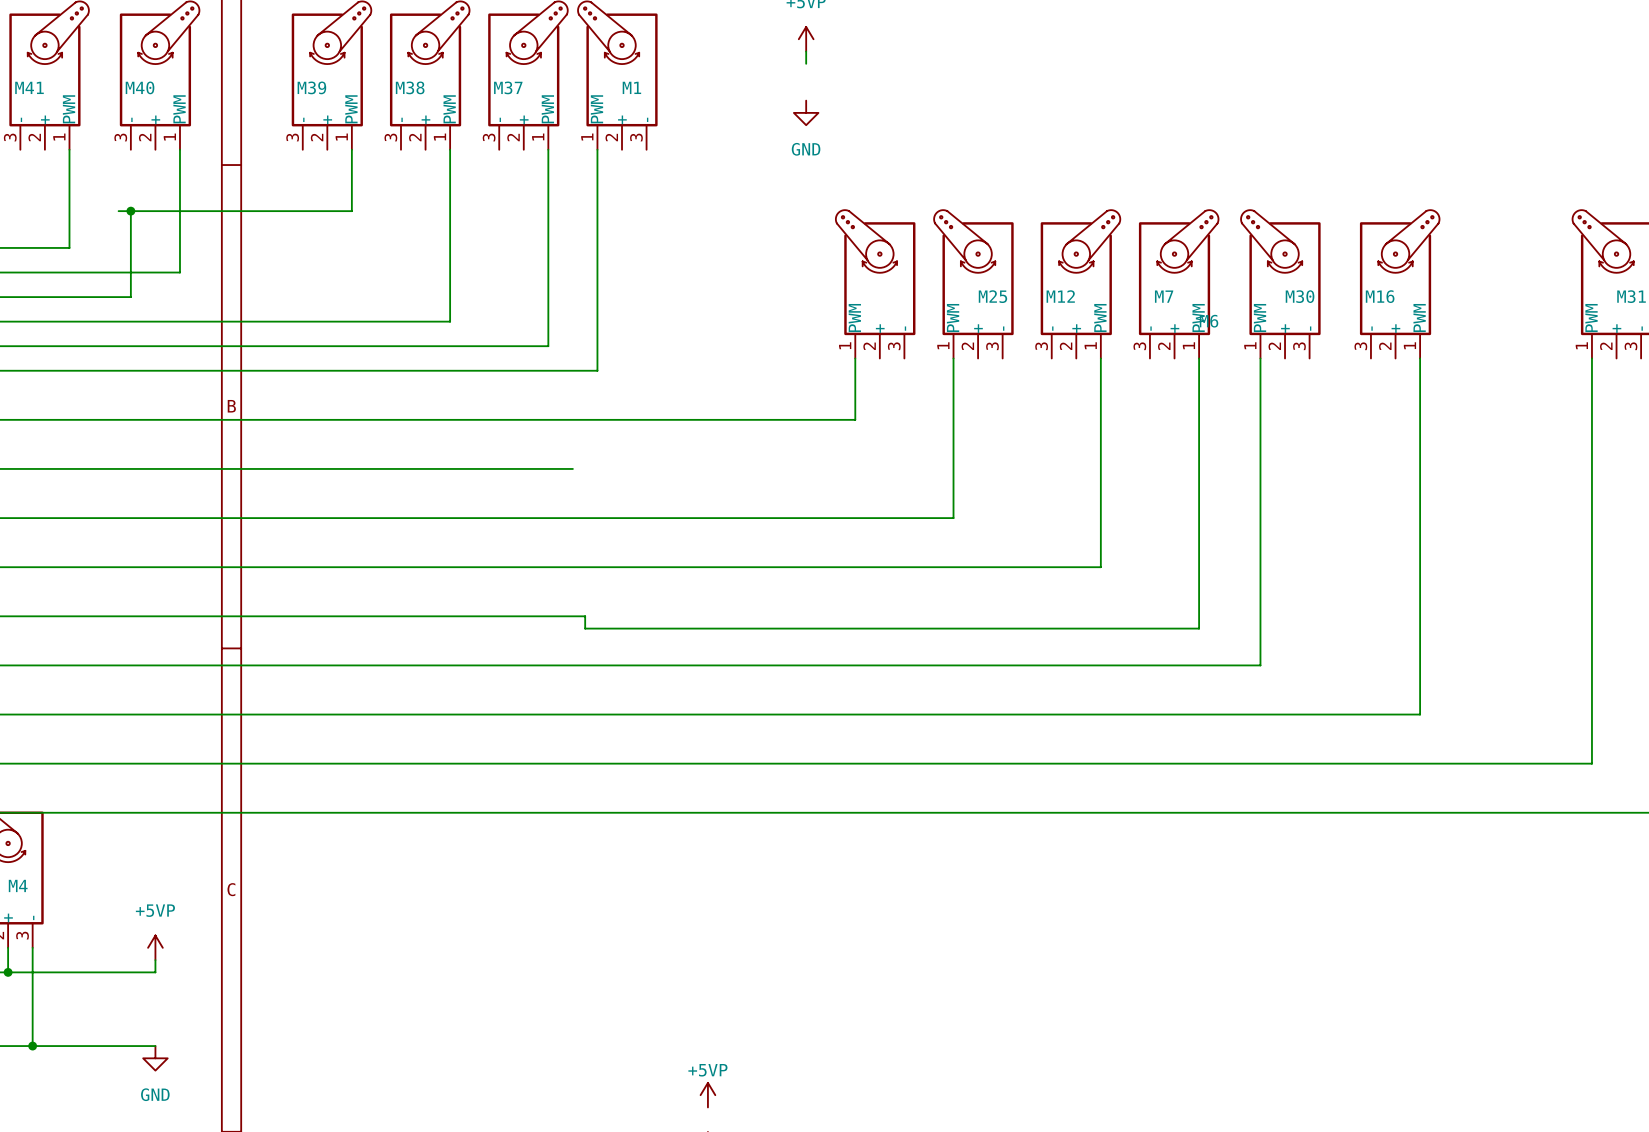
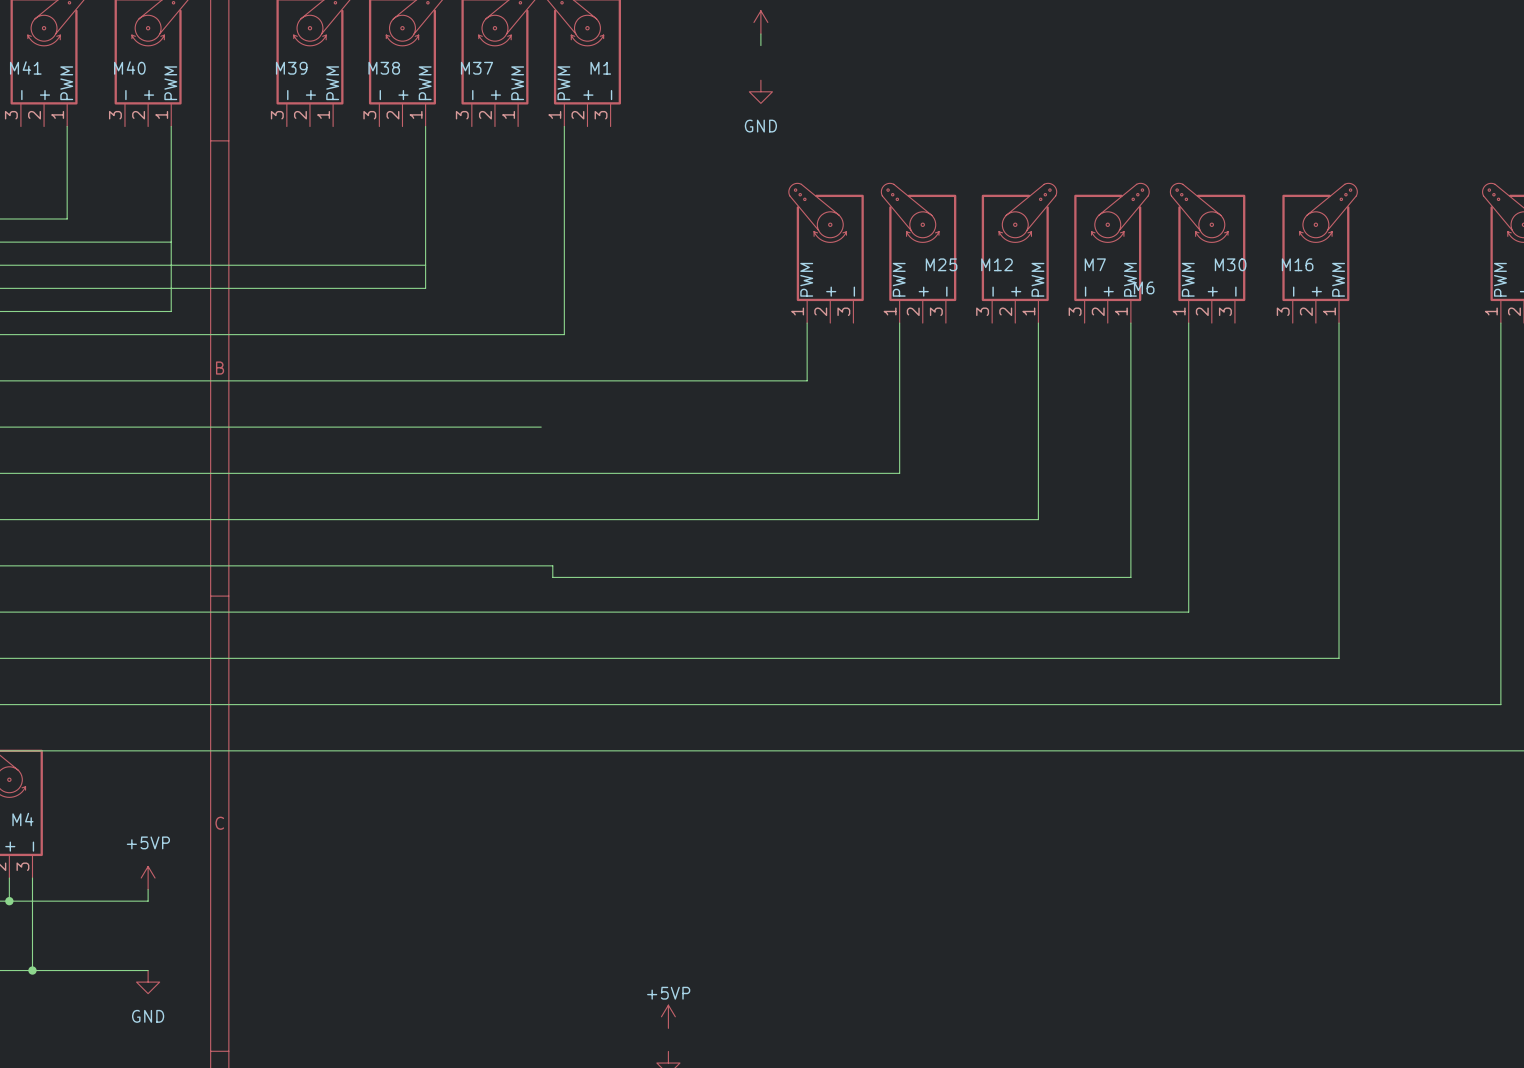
wire: (351, 149) (351, 211) (118, 211) -> none
wire: (548, 149) (548, 346) (179, 346) -> (171, 242) (171, 311)
wire: (130, 211) (130, 297) -> (425, 265) (124, 265)
junction: (130, 211) -> none

